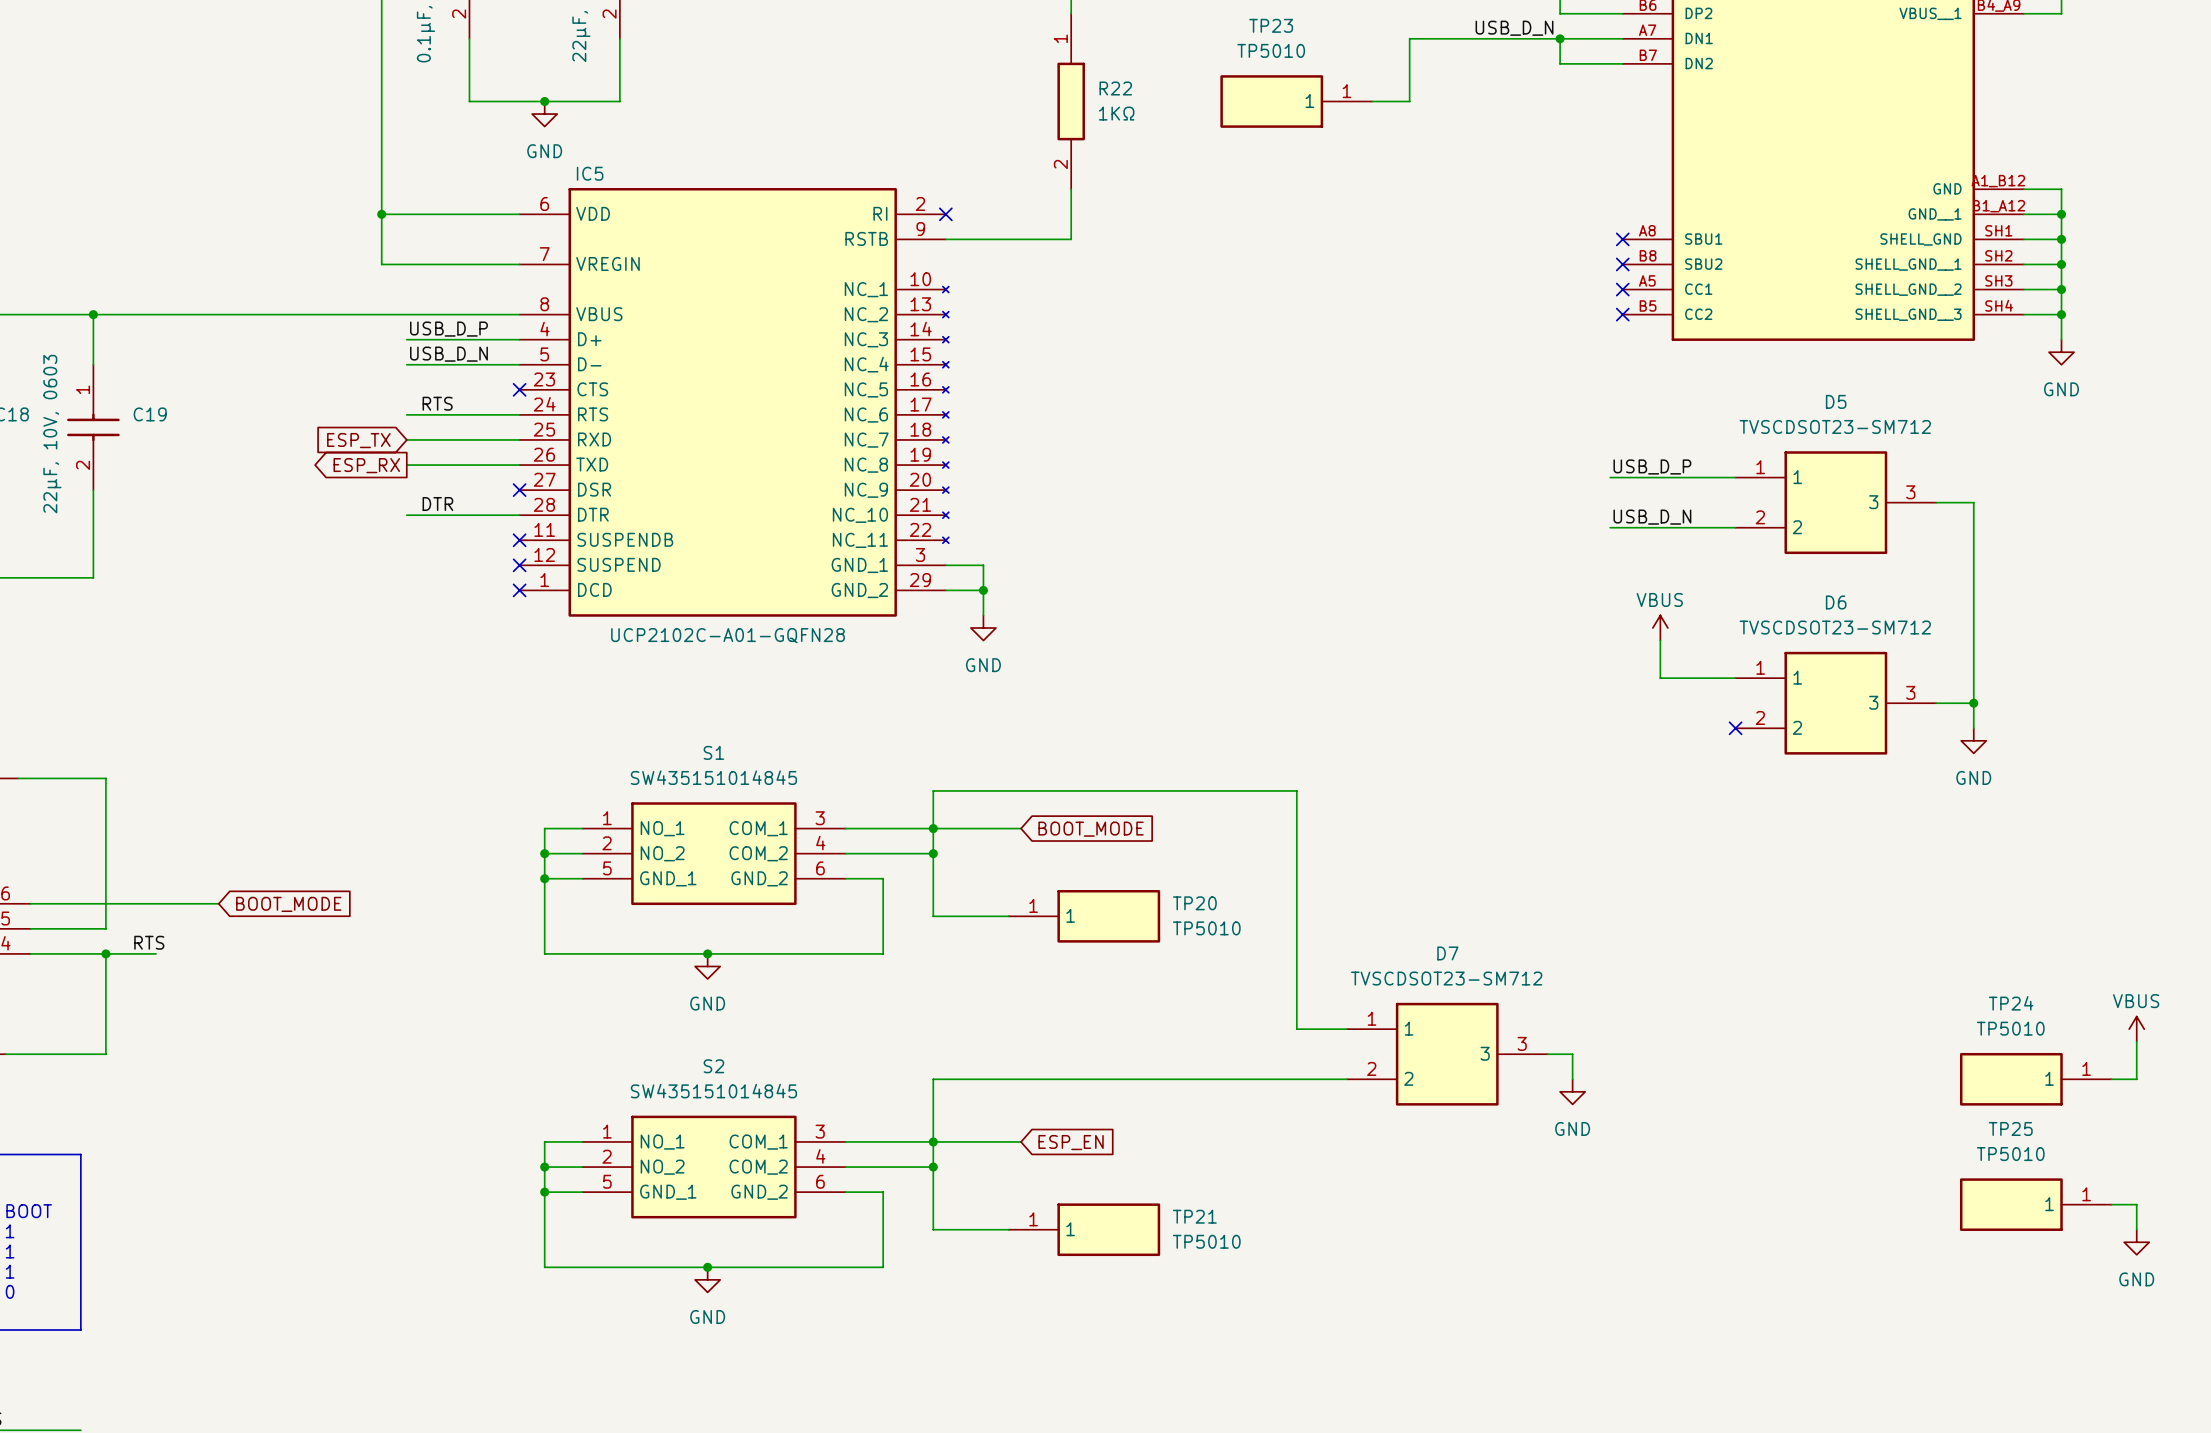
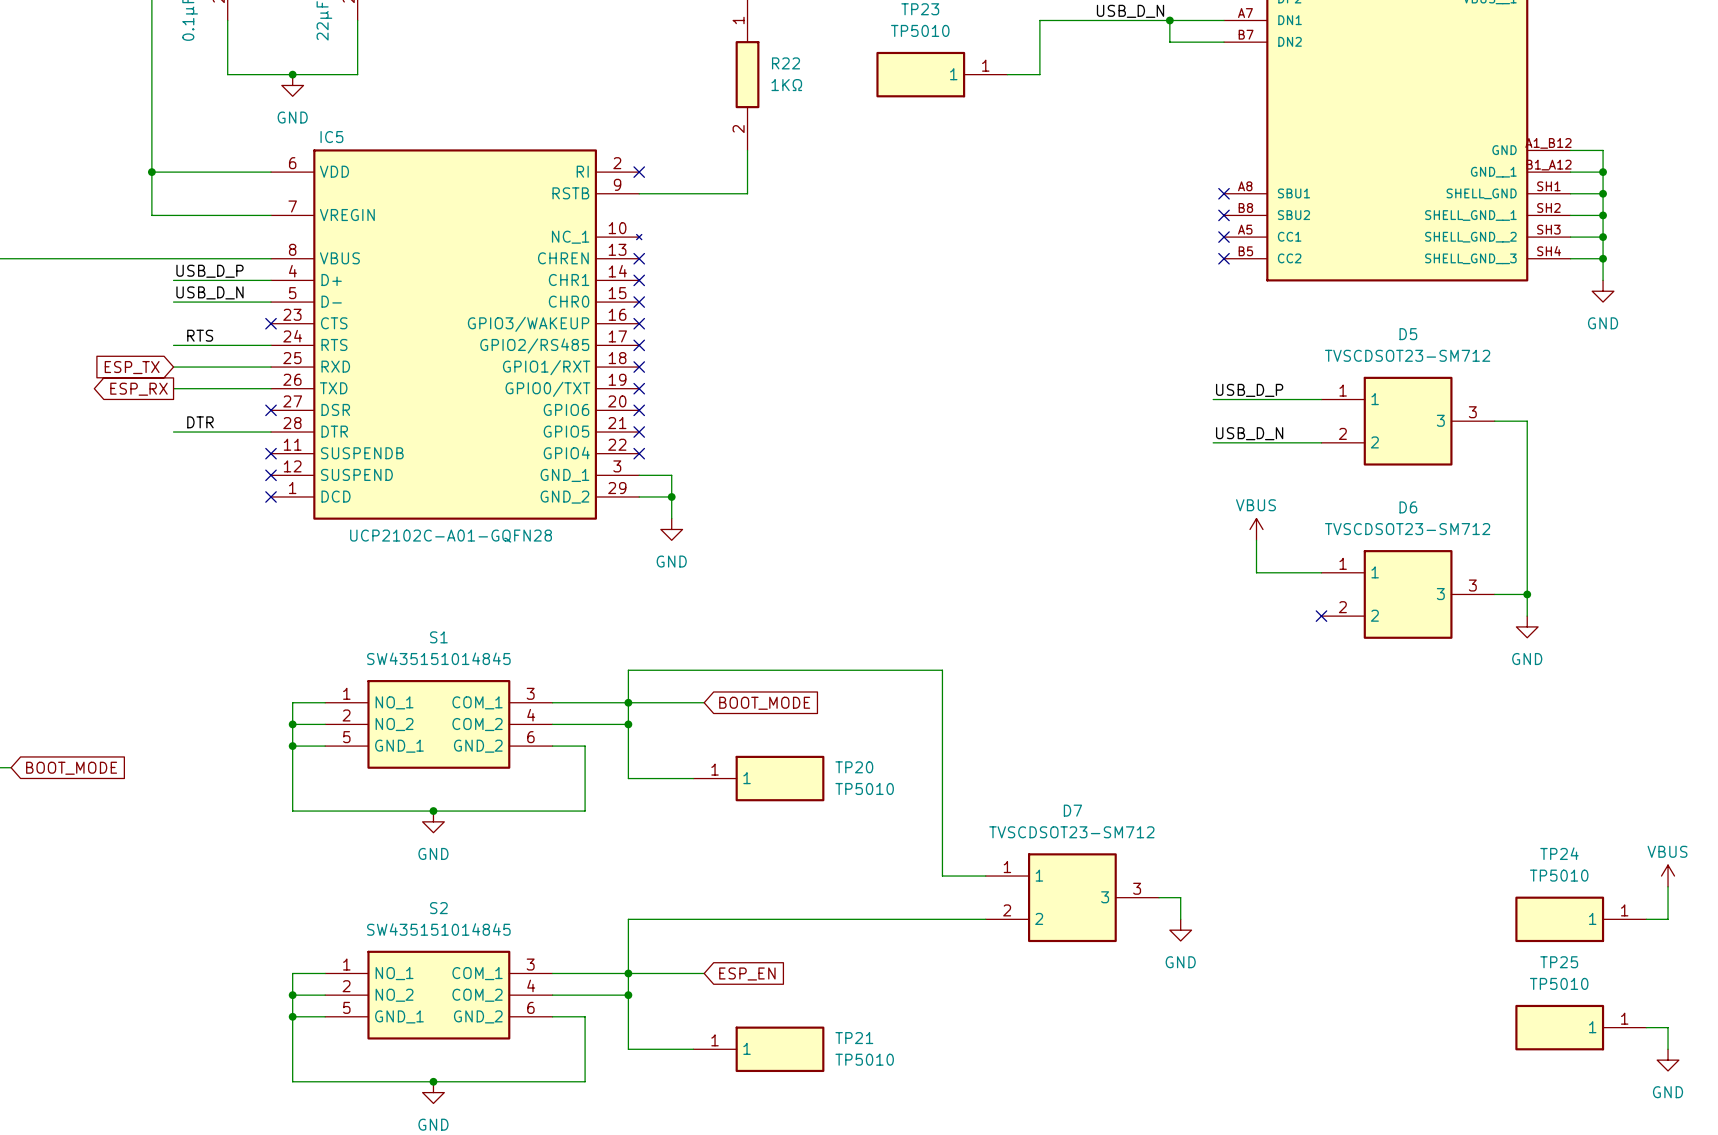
IC5 symbol: [519, 188, 949, 617] -> [271, 149, 642, 520]
no-connect mark: none -> (639, 258)
no-connect mark: none -> (639, 280)
no-connect mark: none -> (639, 302)
no-connect mark: none -> (639, 323)
no-connect mark: none -> (639, 345)
no-connect mark: none -> (639, 367)
no-connect mark: none -> (639, 388)
no-connect mark: none -> (639, 410)
no-connect mark: none -> (639, 432)
no-connect mark: none -> (639, 453)

